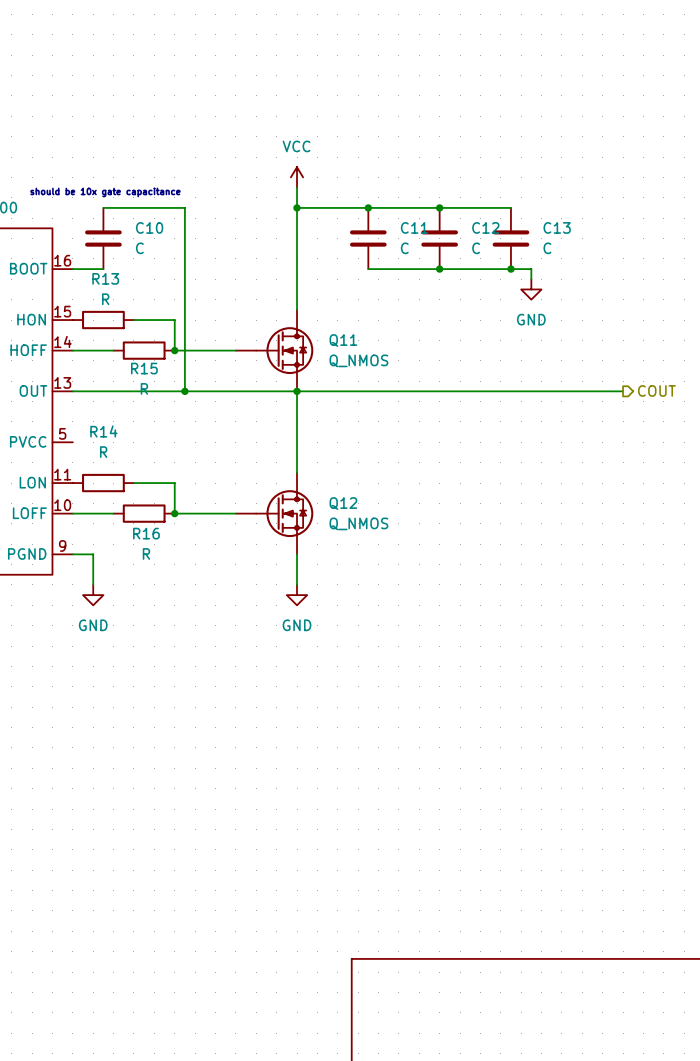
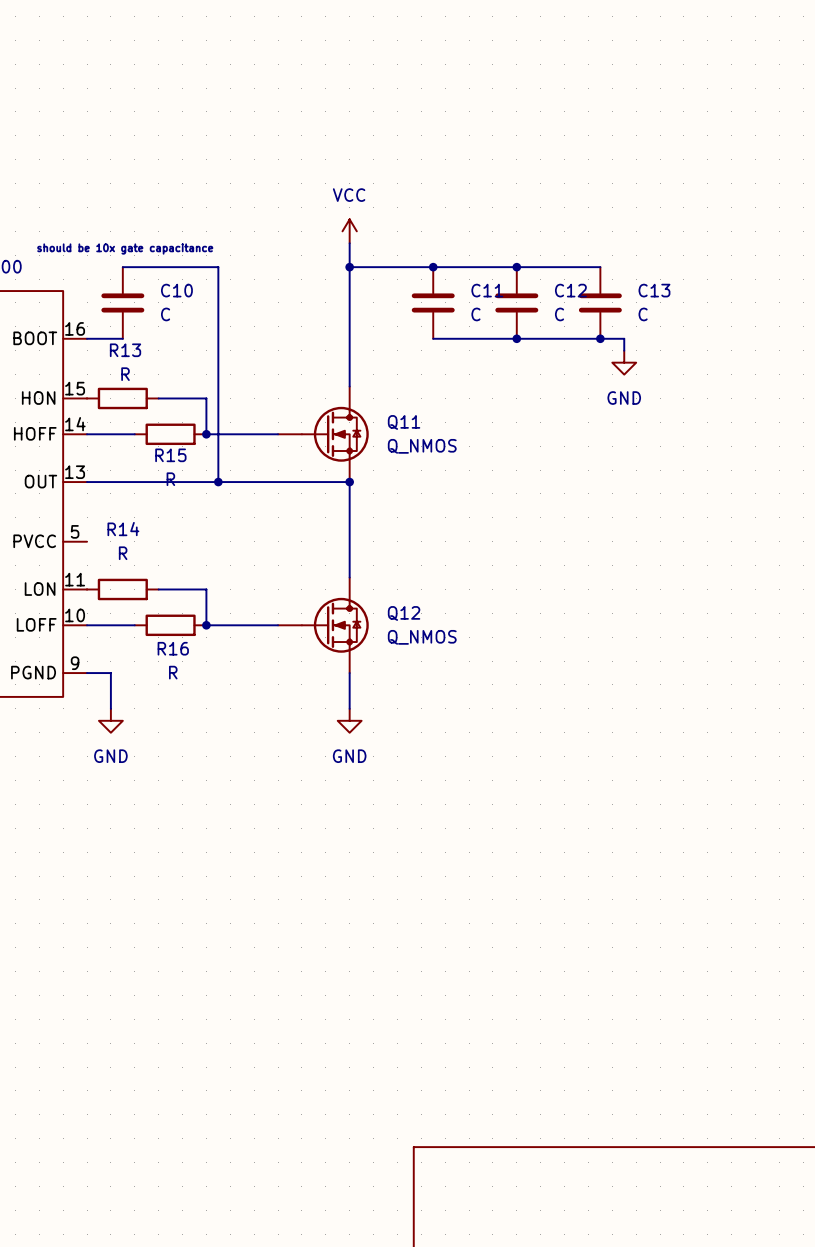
hierarchical label: COUT (656, 390) -> none
wire: (297, 391) (623, 391) -> none

